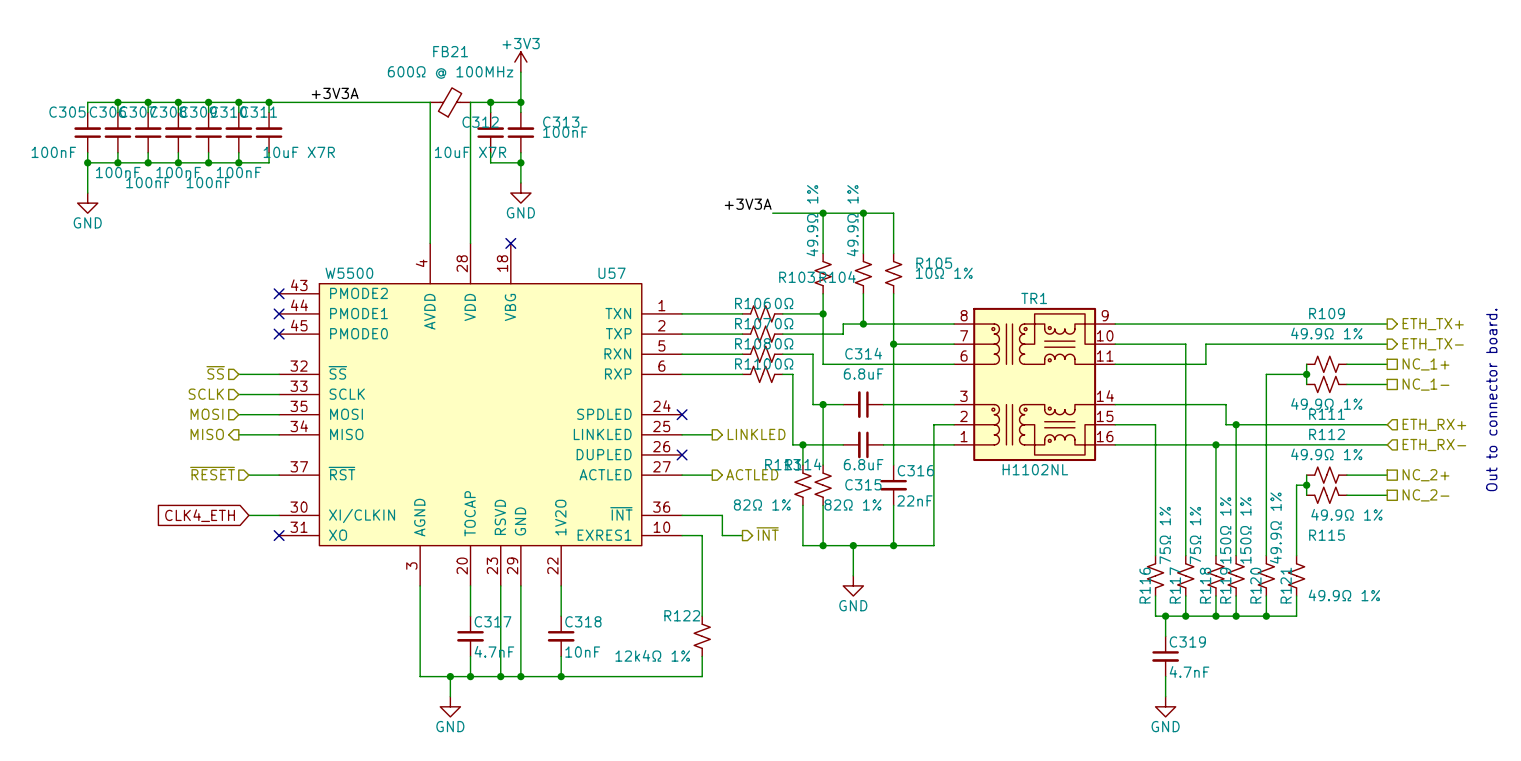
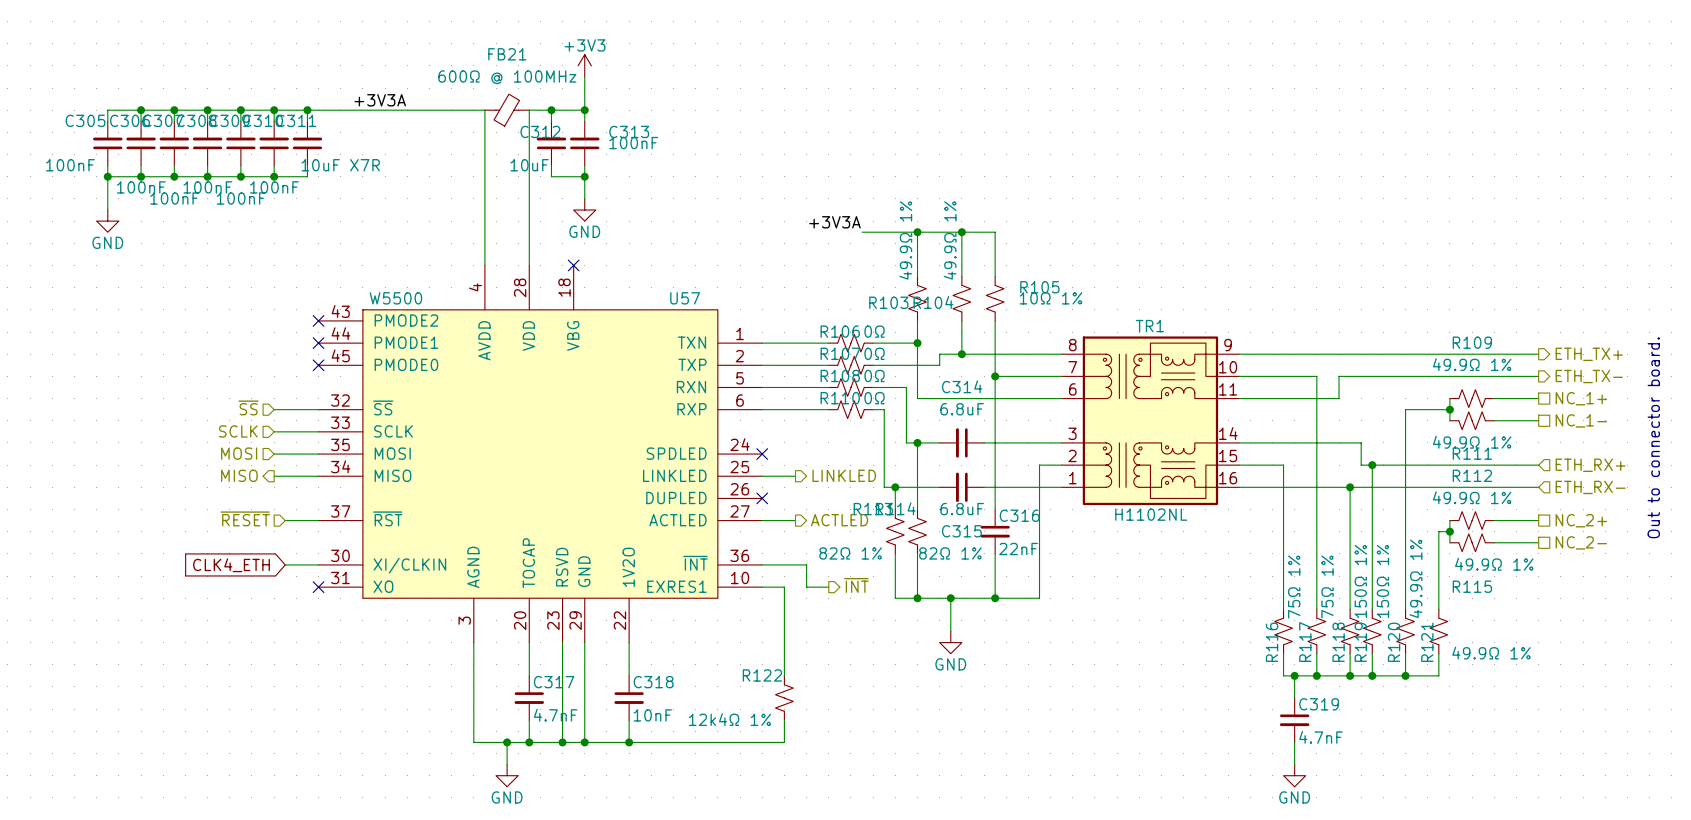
C312 value: 10uF X7R (470, 152) -> 10uF (529, 165)

